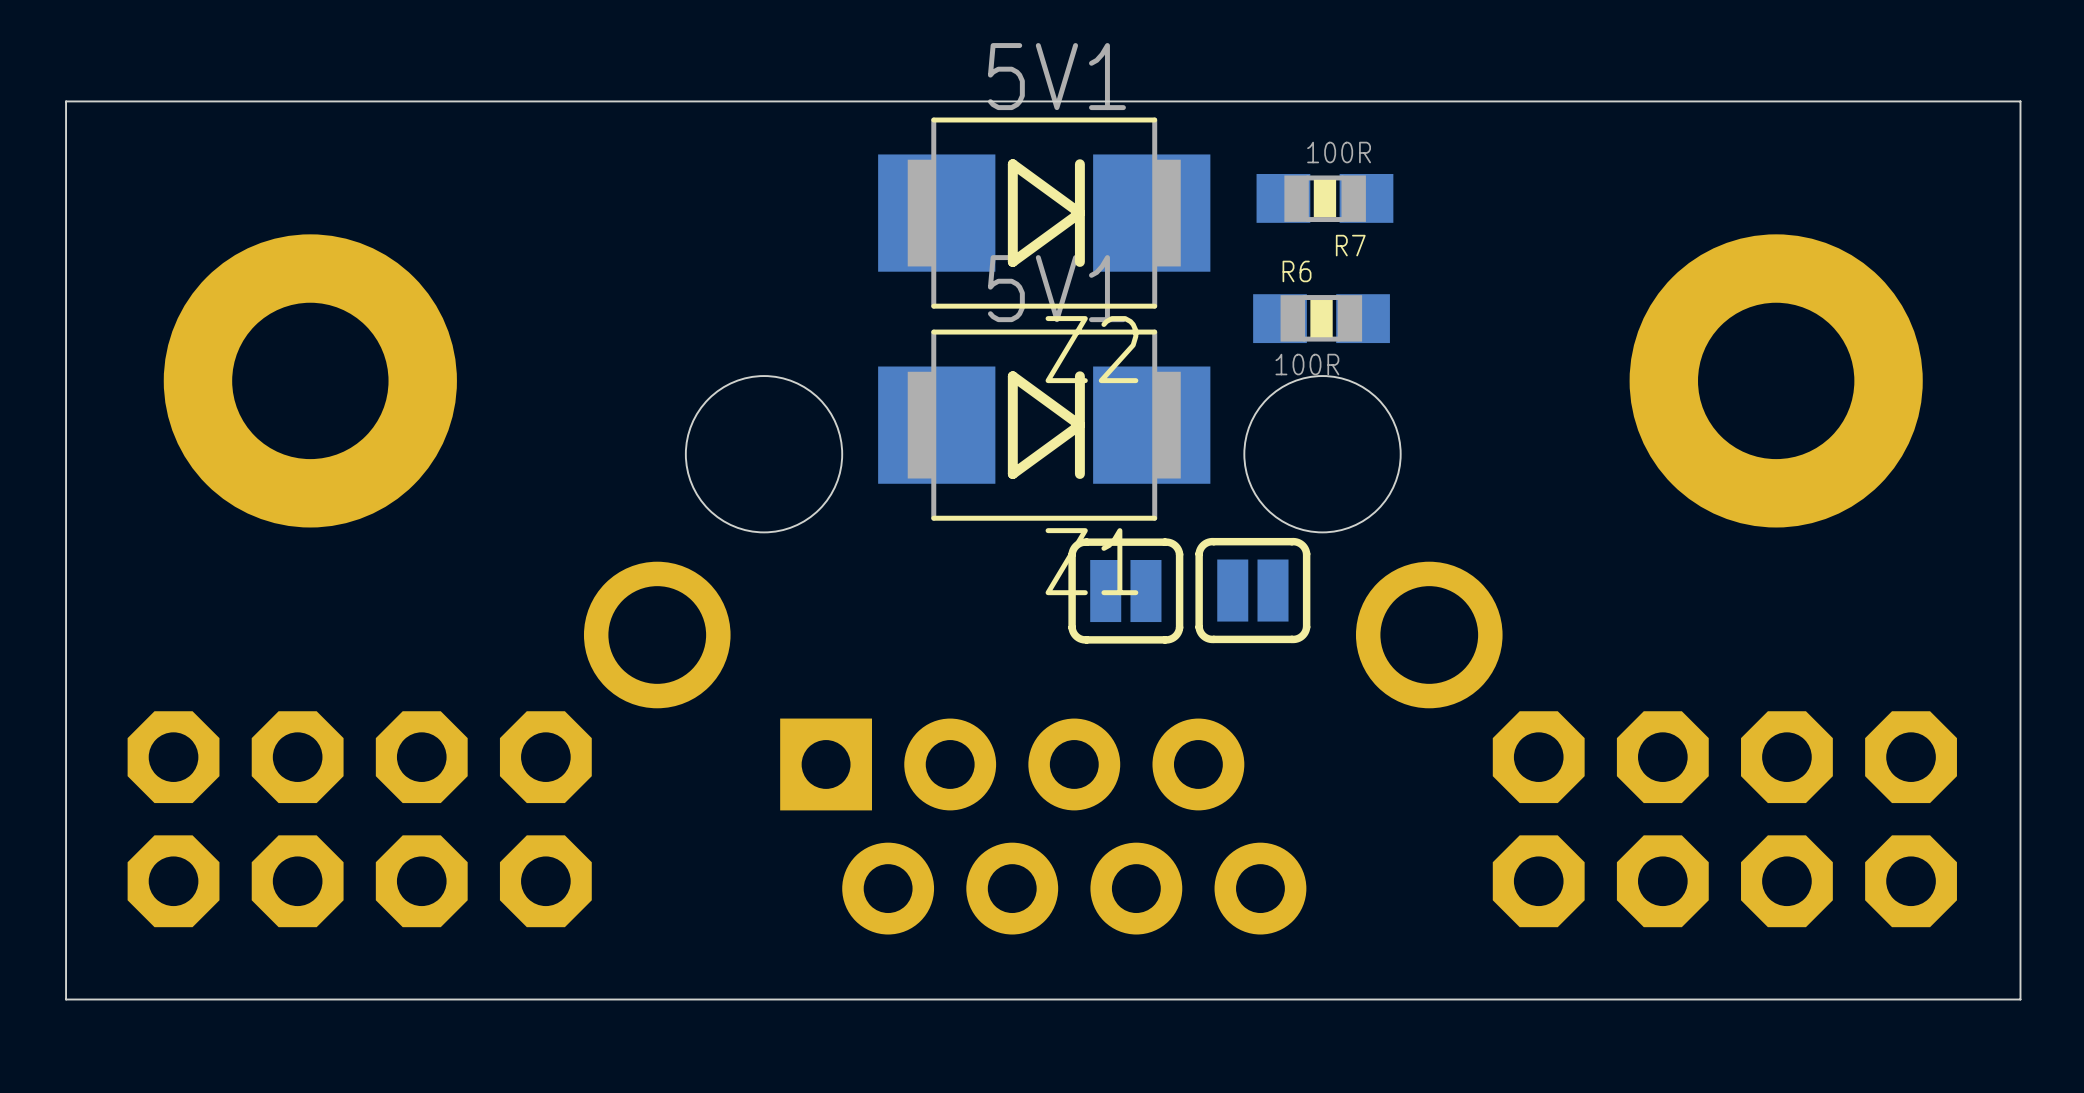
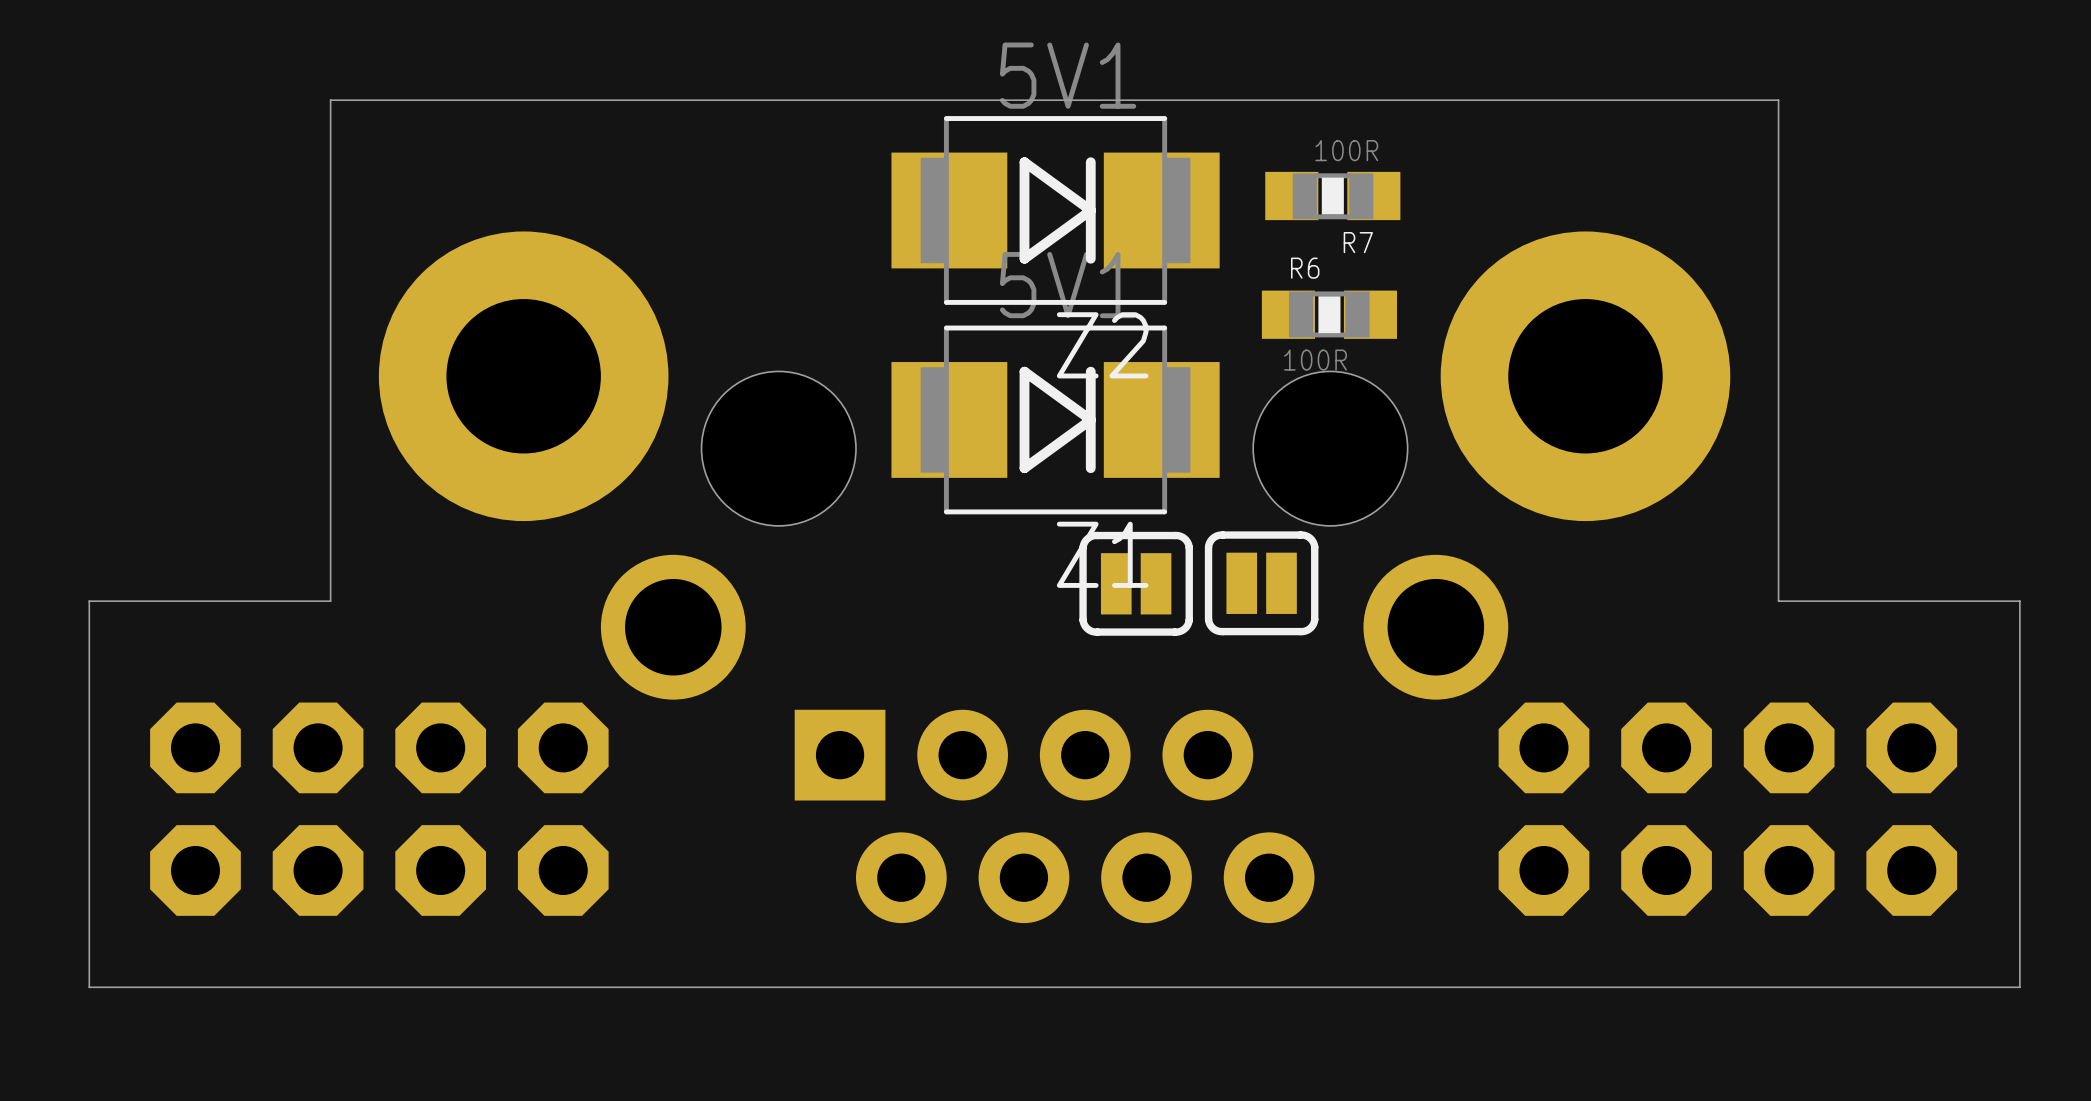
board edge: (310, 101) (66, 101) (66, 608) -> (330, 100) (330, 601) (89, 601)
board edge: (1776, 101) (2020, 101) (2020, 608) -> (1778, 100) (1778, 601) (2019, 601)
part position: (310, 380) -> (523, 376)
part position: (1776, 380) -> (1585, 376)

